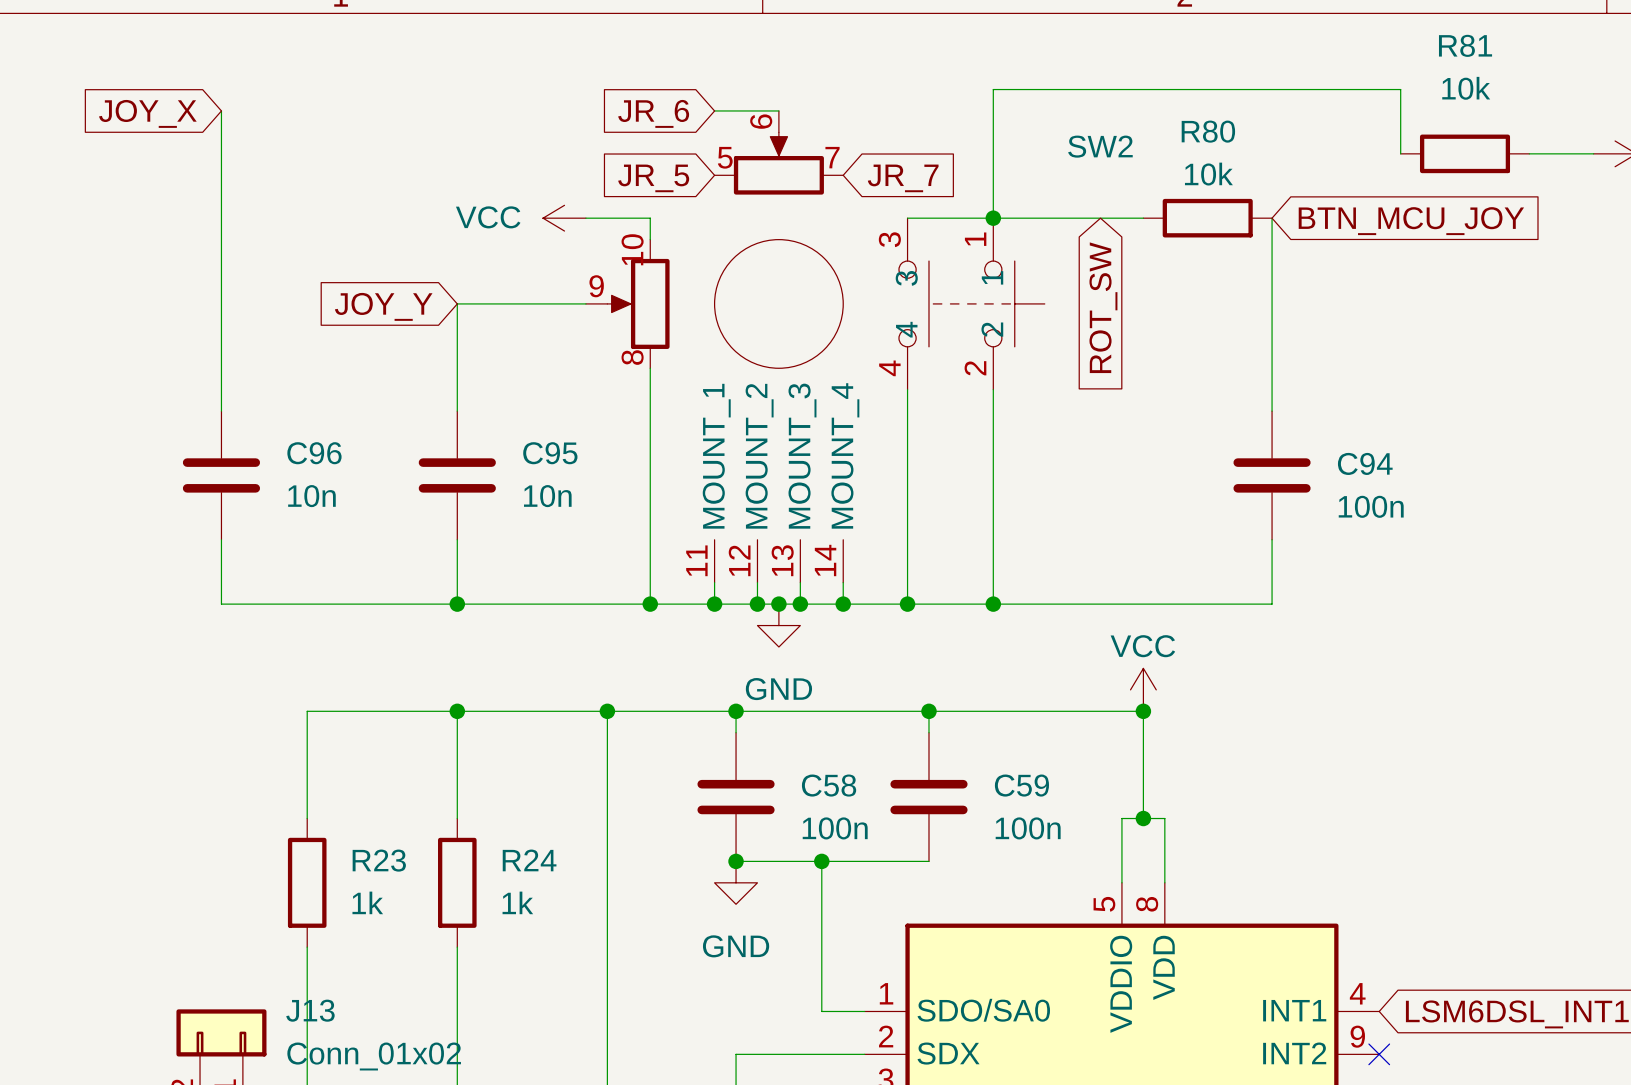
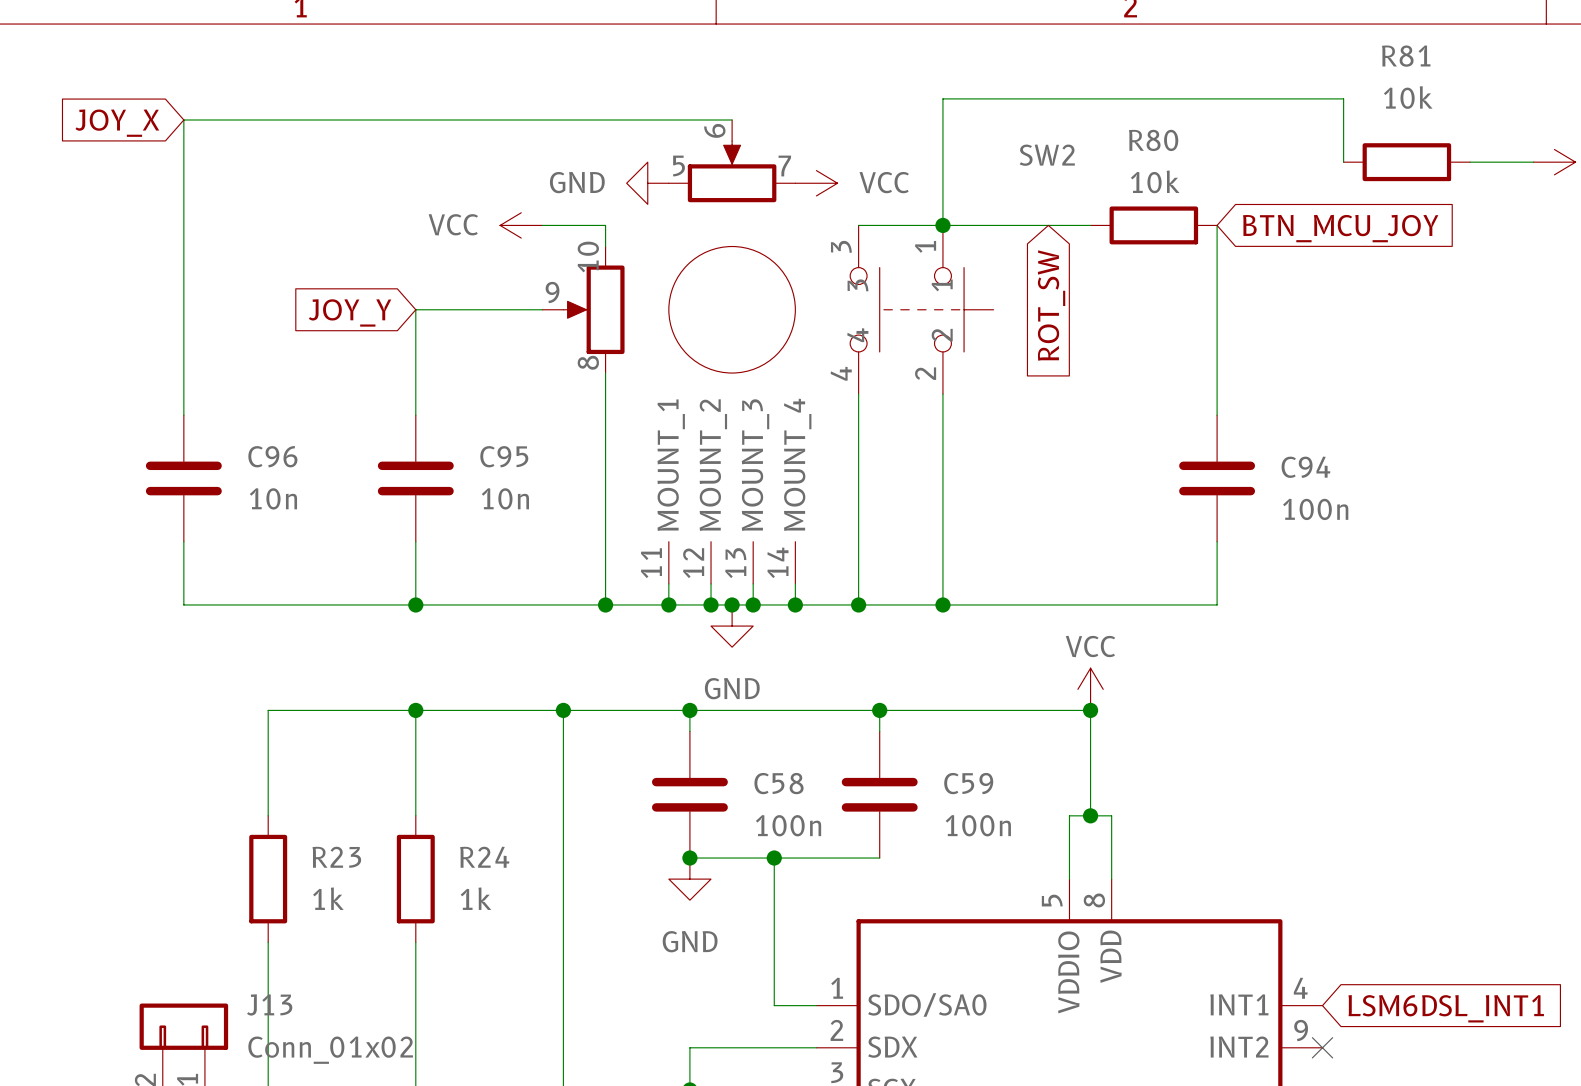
wire: none -> (183, 119) (668, 119)
global label: JR_6 (653, 113) -> none
power symbol: none -> GND (647, 183)
power symbol: none -> VCC (816, 183)
global label: JR_5 (653, 178) -> none
global label: JR_7 (903, 178) -> none

